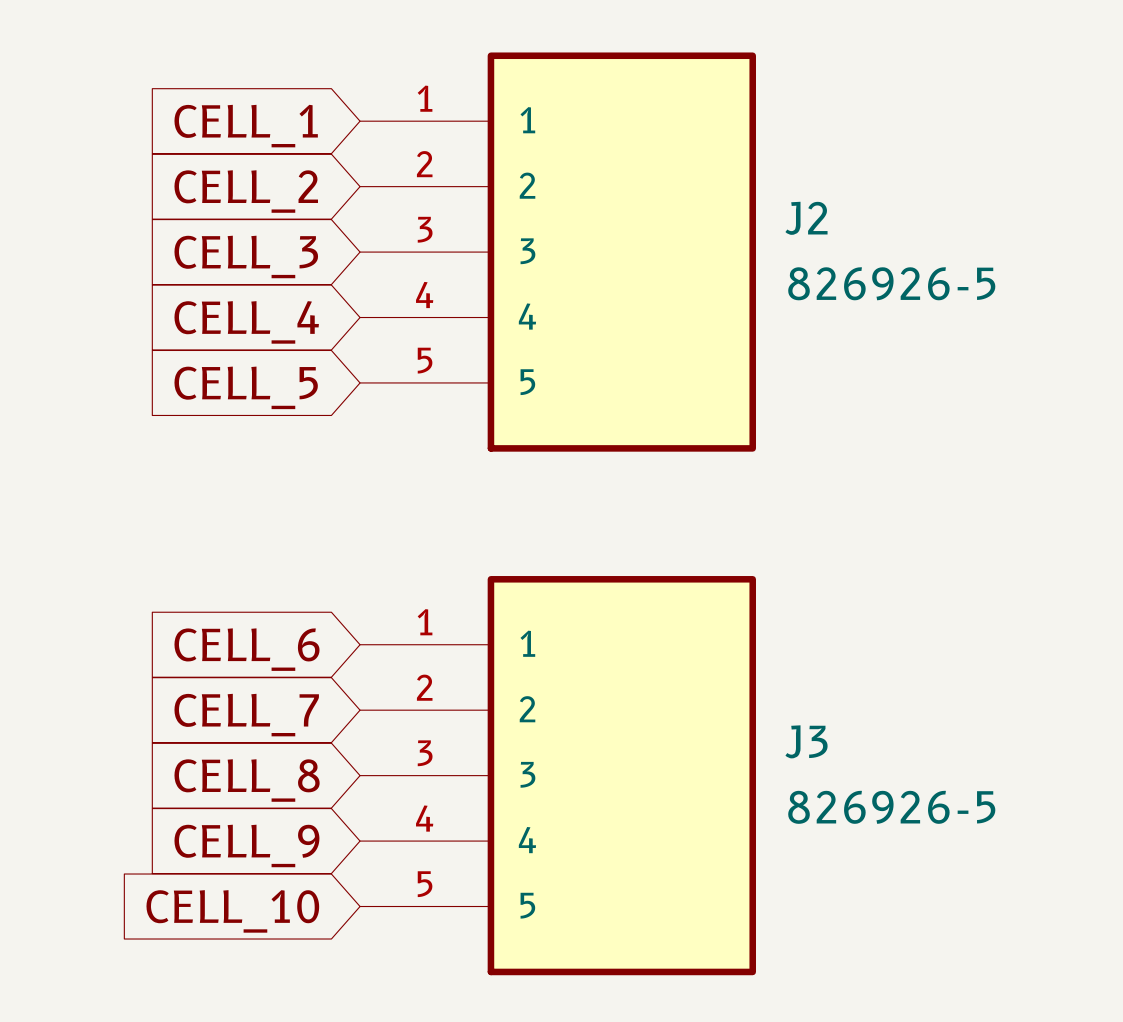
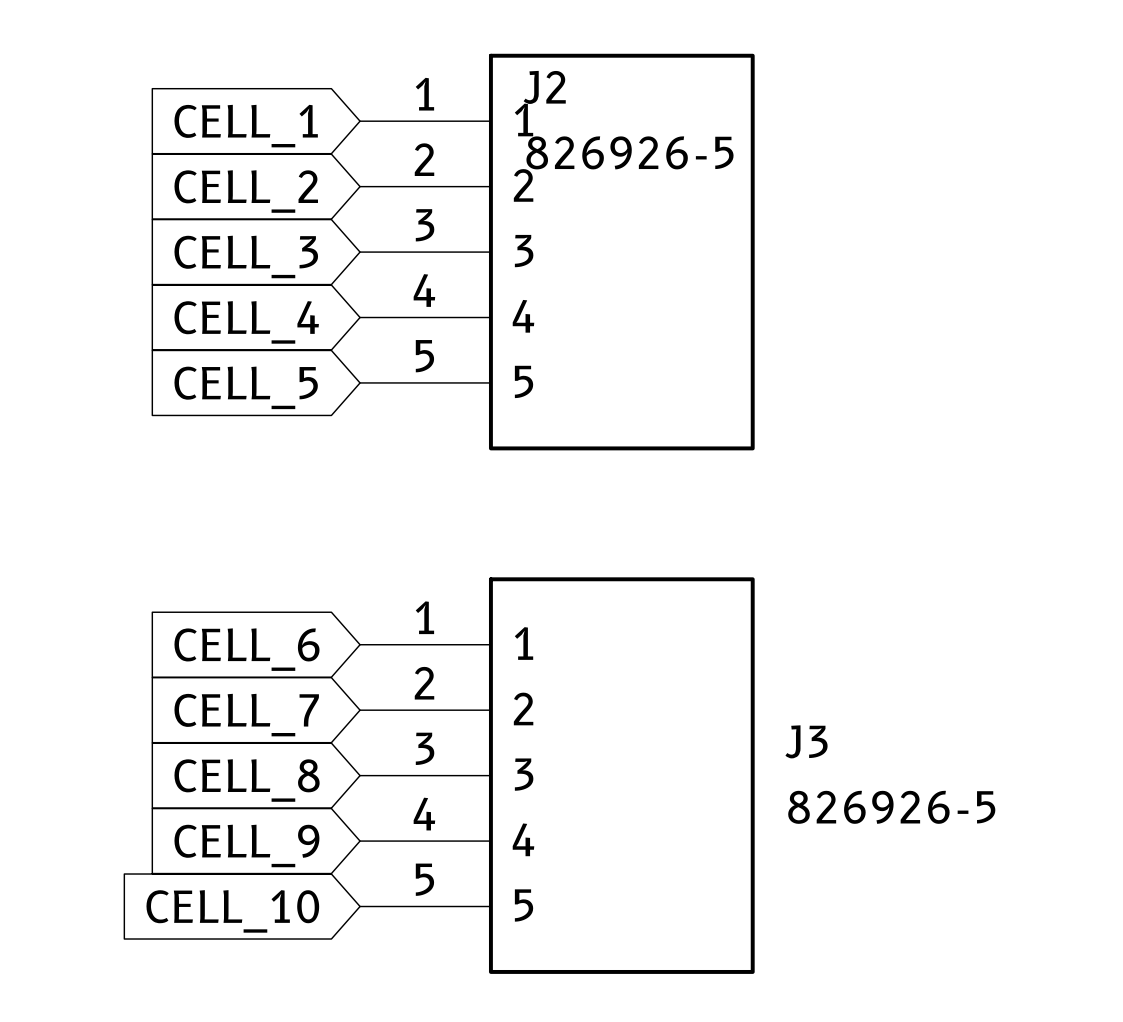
J2 symbol: [360, 52, 756, 452] -> [360, 53, 755, 451]
J2 name position: J2 (806, 218) -> J2 (544, 87)
J2 value position: 826926-5 (891, 283) -> 826926-5 (629, 152)
J3 symbol: [360, 576, 756, 976] -> [360, 577, 755, 974]

